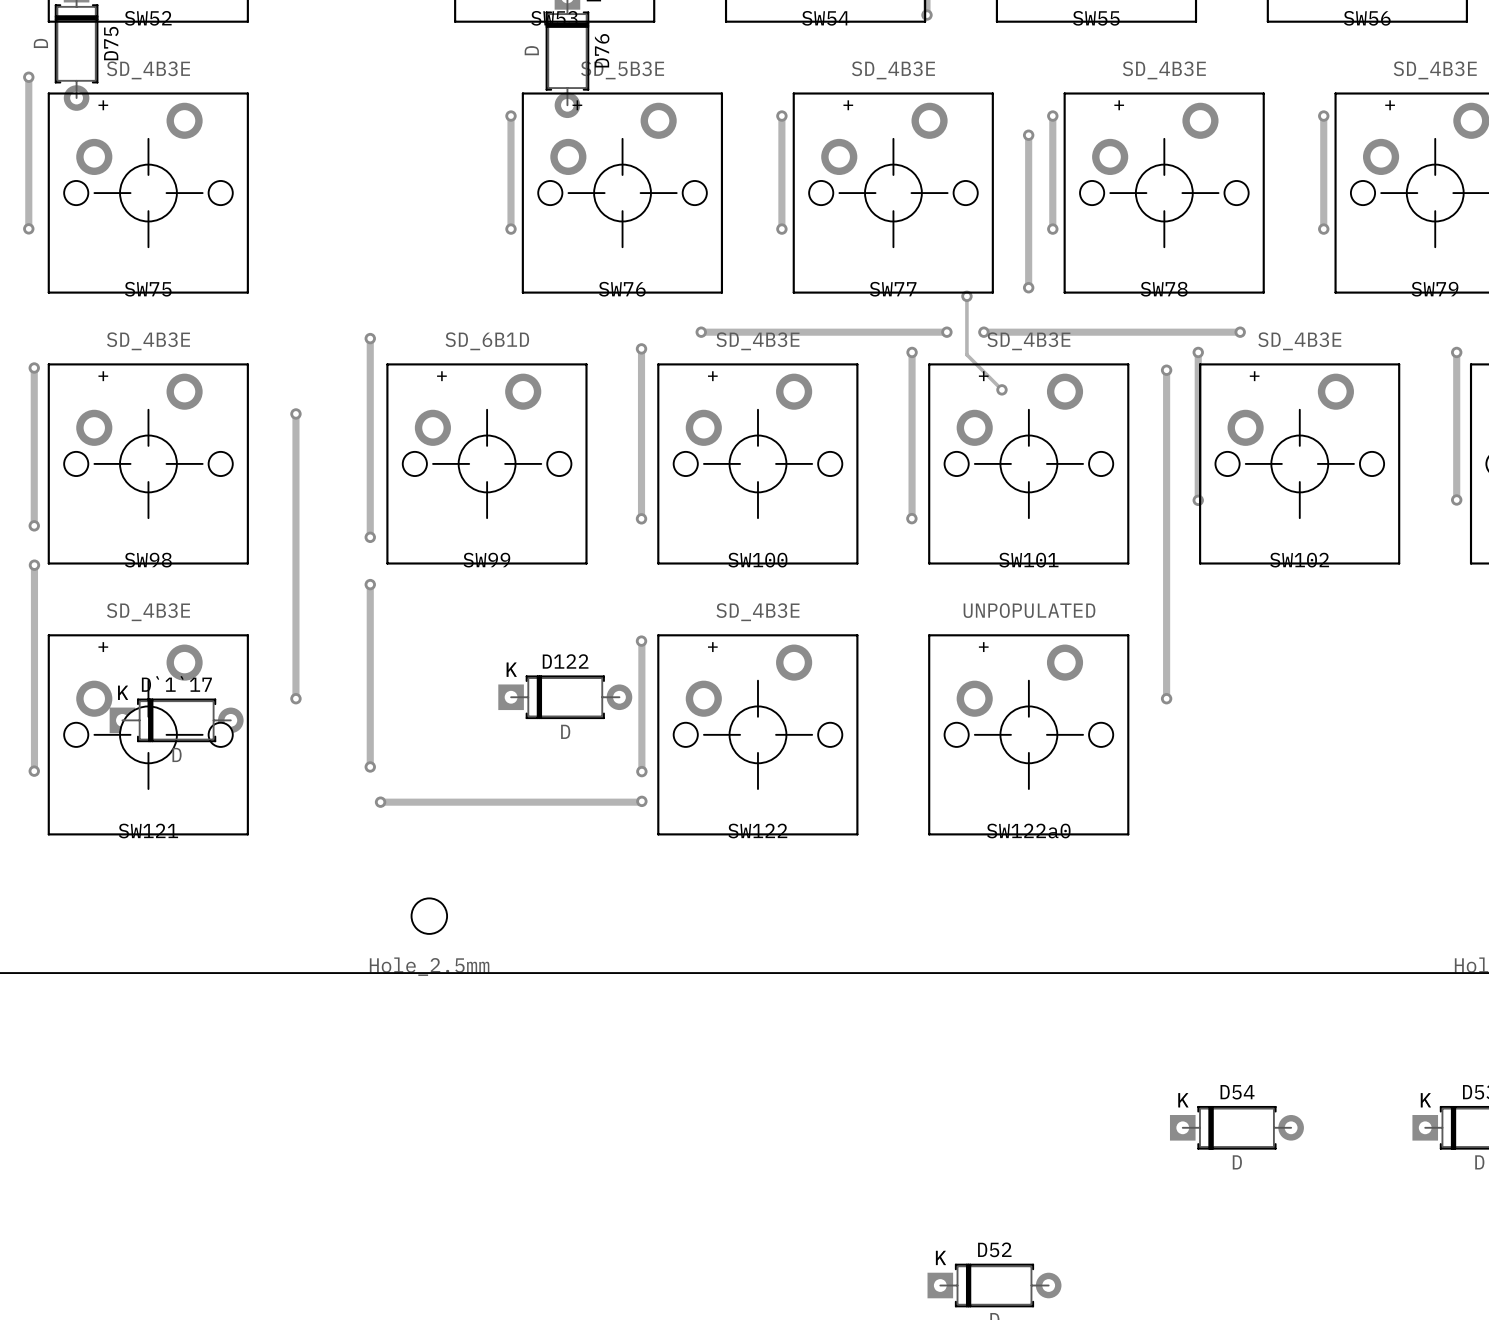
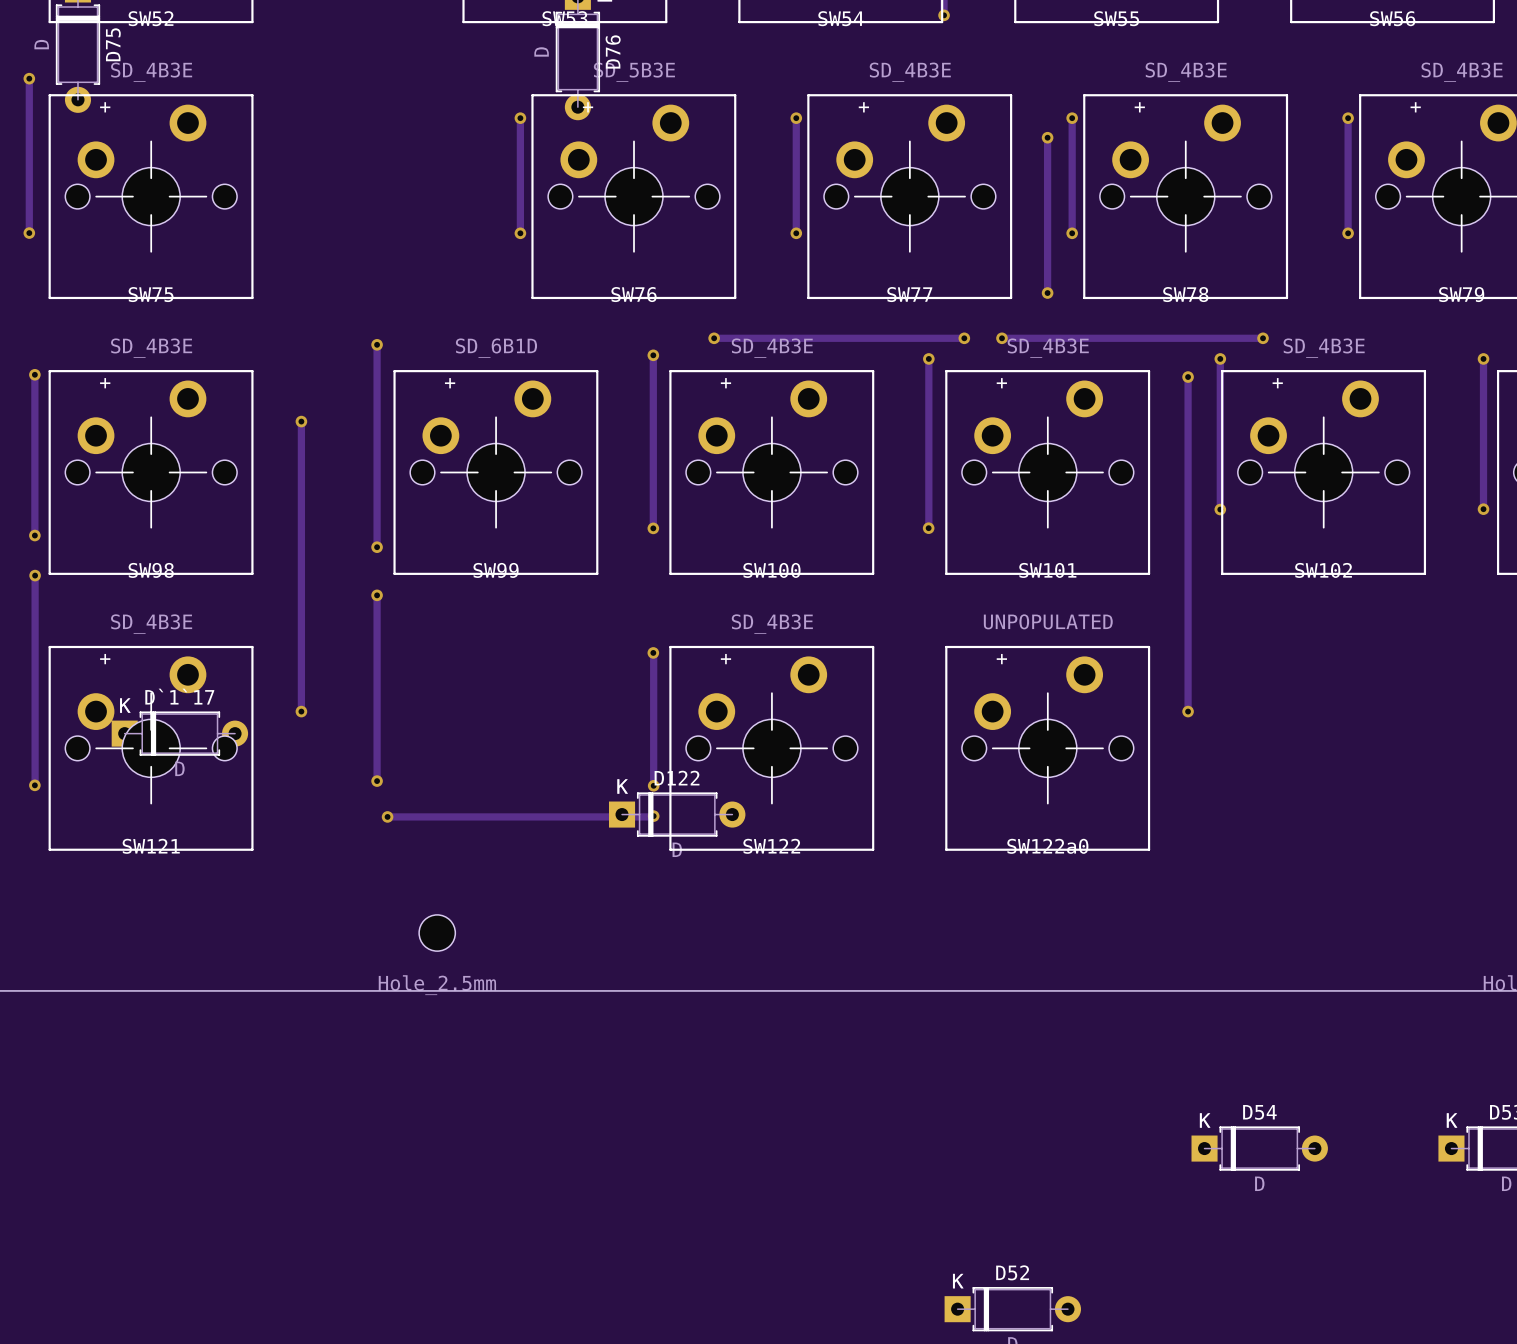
track: (966, 296) (966, 354) (1001, 389) -> none
via: (966, 296) -> none
via: (1001, 389) -> none
D122 position: (565, 697) -> (677, 814)

